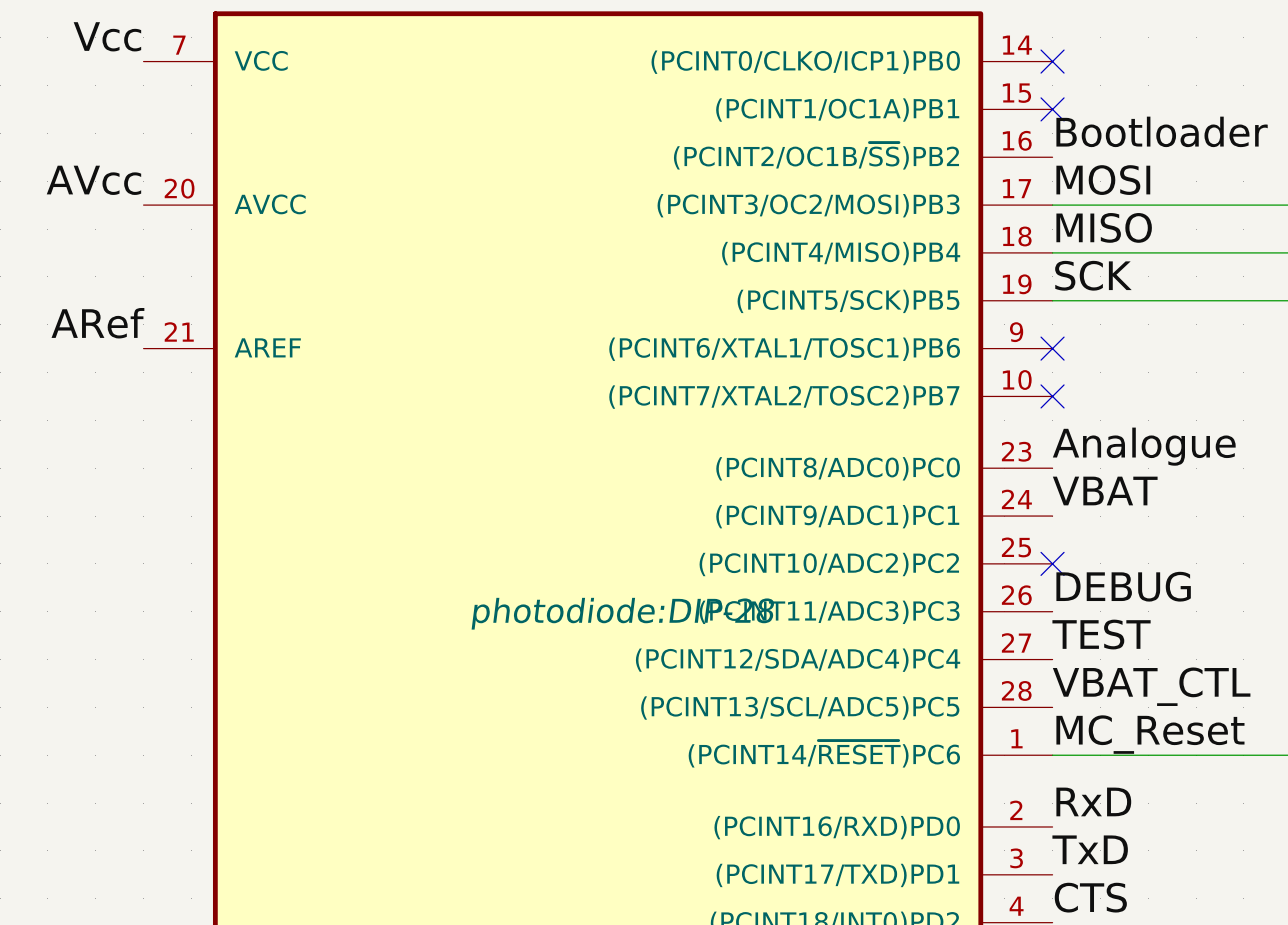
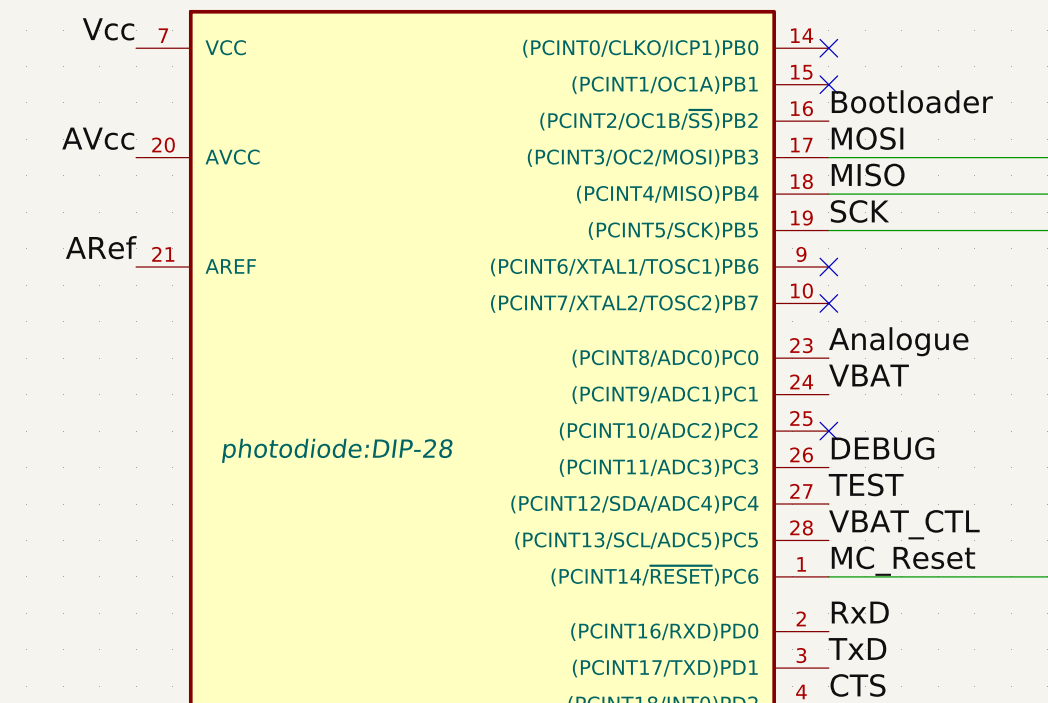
part text position: photodiode:DIP-28 (622, 613) -> photodiode:DIP-28 (337, 450)

